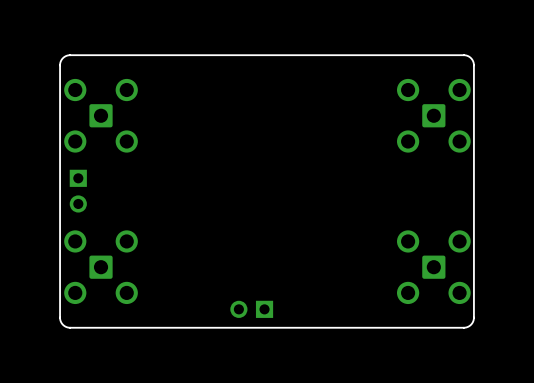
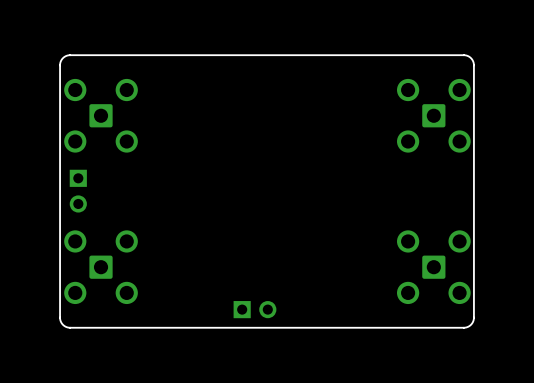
part rotation: 0° (251, 309) -> 180° (254, 309)

